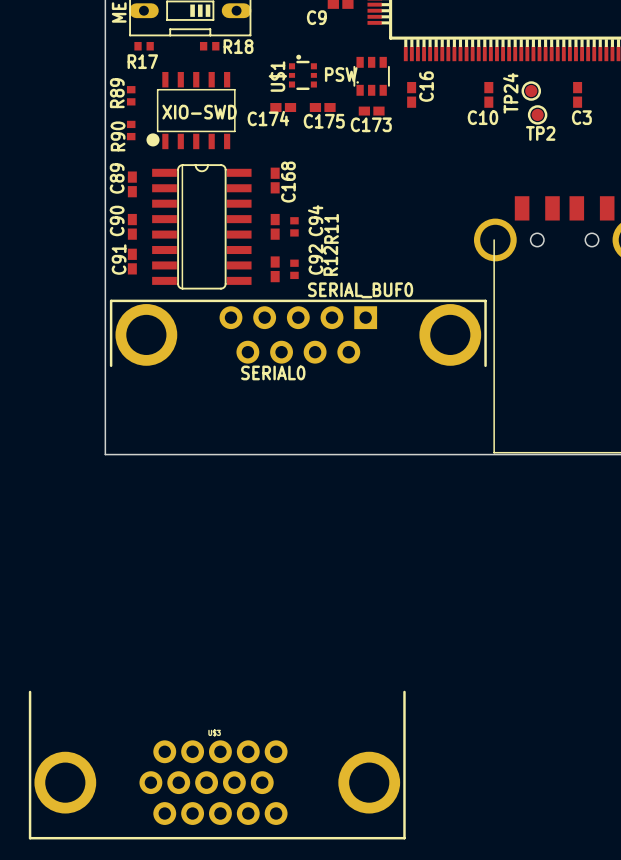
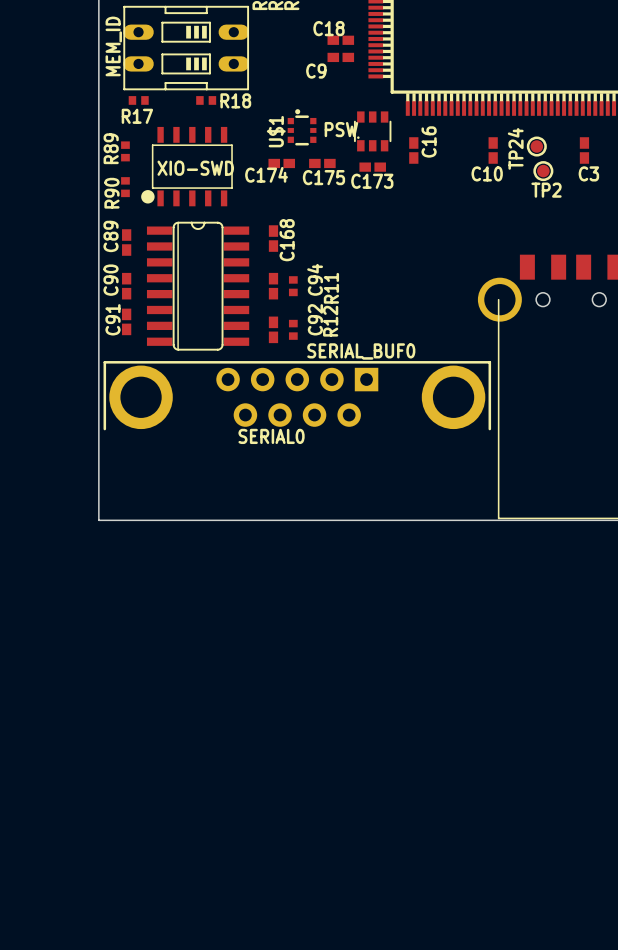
part: (217, 765) -> none

